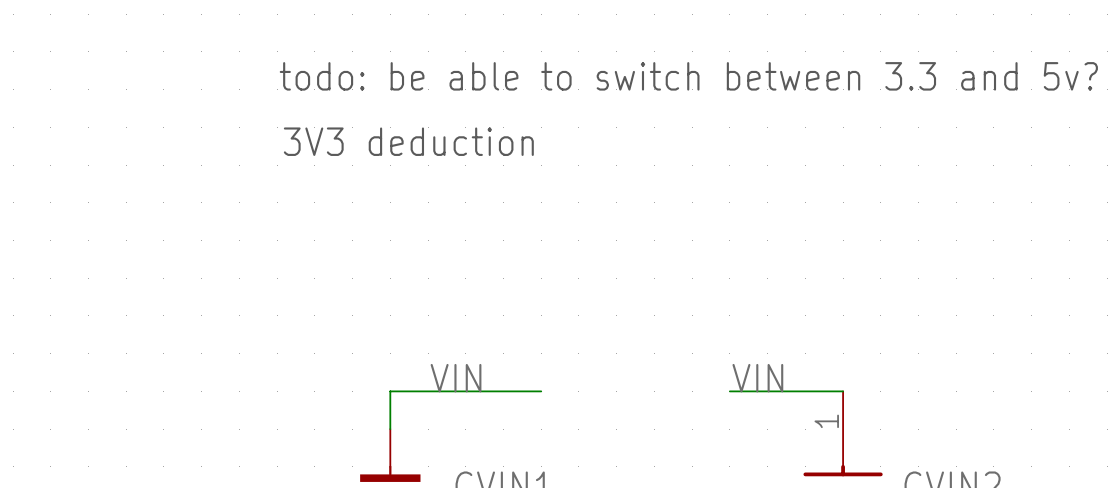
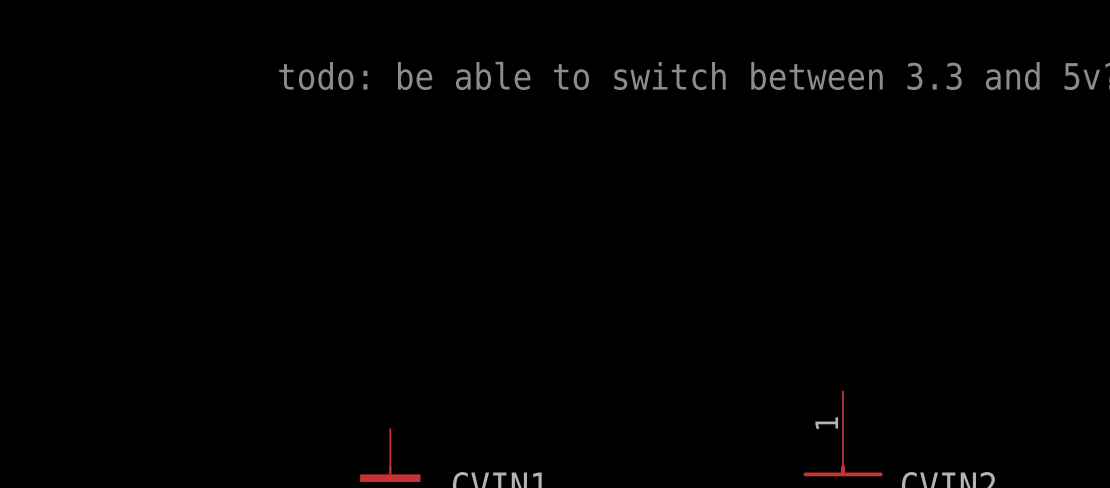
text: 3V3 deduction (408, 141) -> none
label: VIN (456, 378) -> none
label: VIN (757, 378) -> none
wire: (541, 391) (390, 391) (390, 429) -> none
wire: (729, 391) (843, 391) -> none

